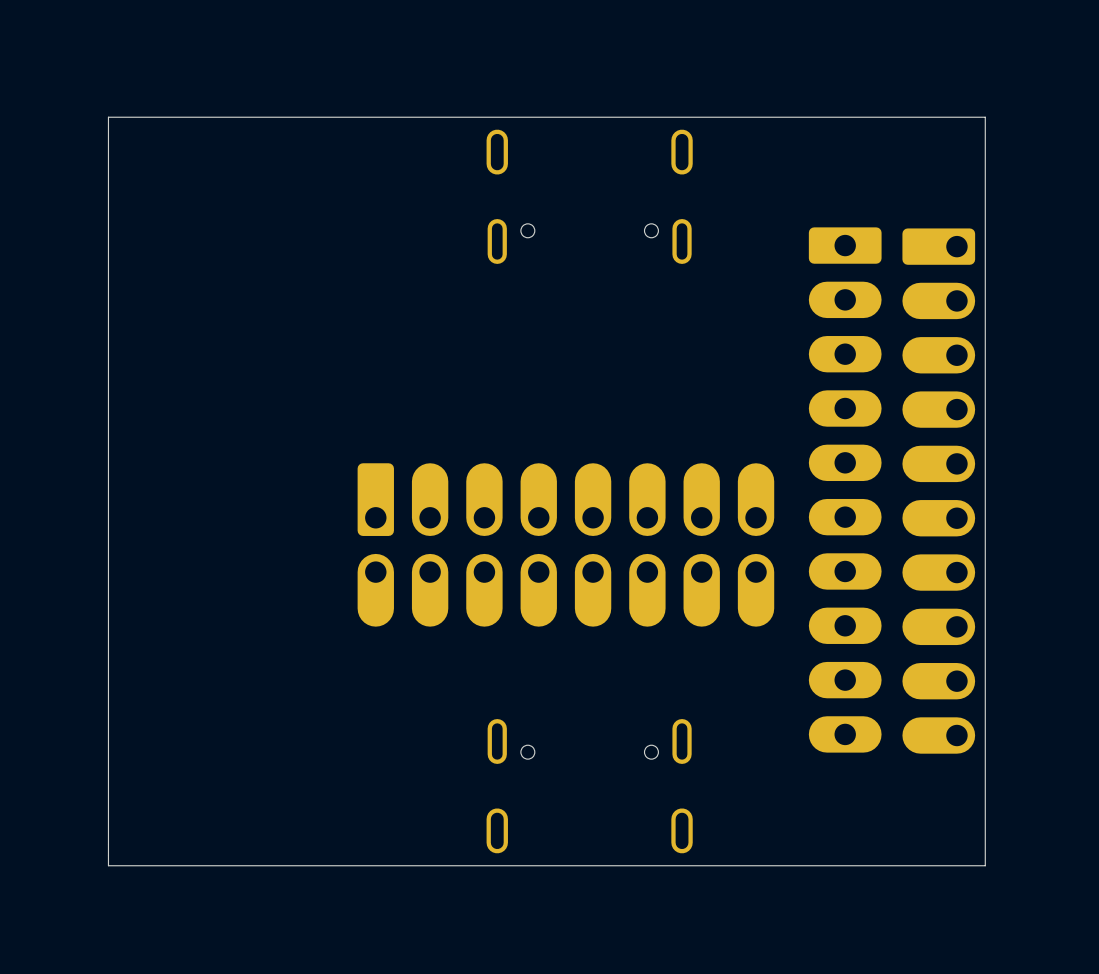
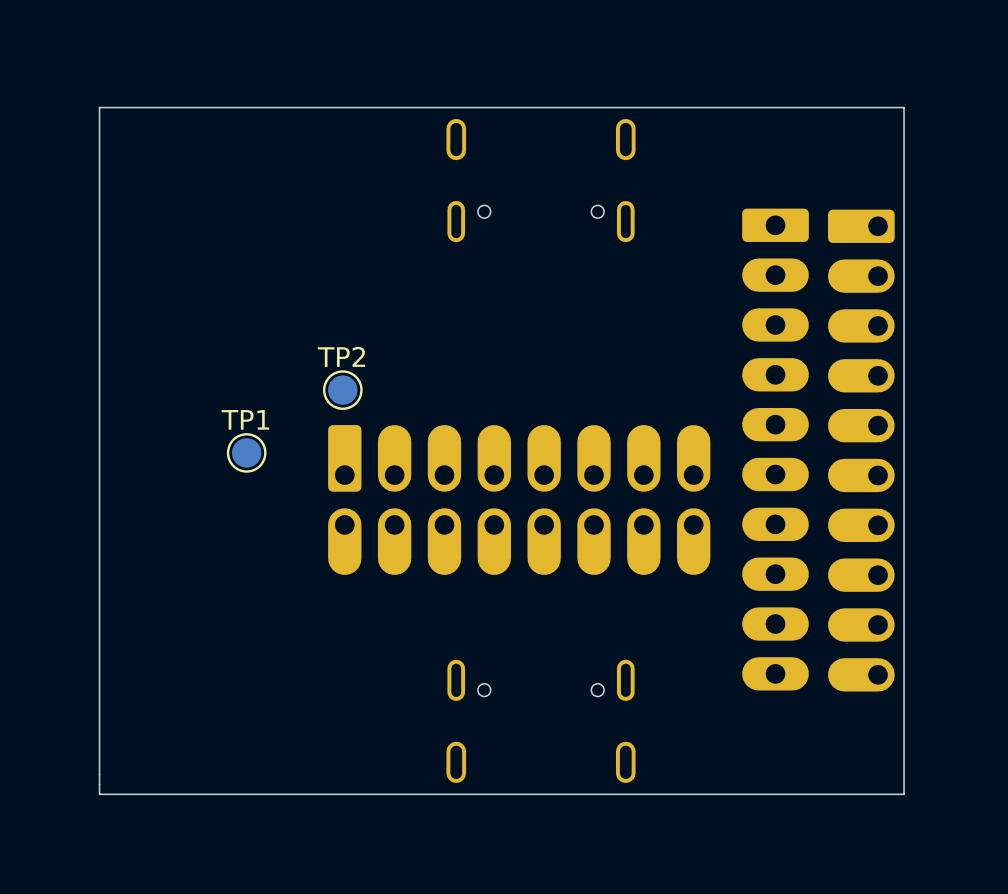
TP2: none -> (342, 390)
TP1: none -> (246, 452)

